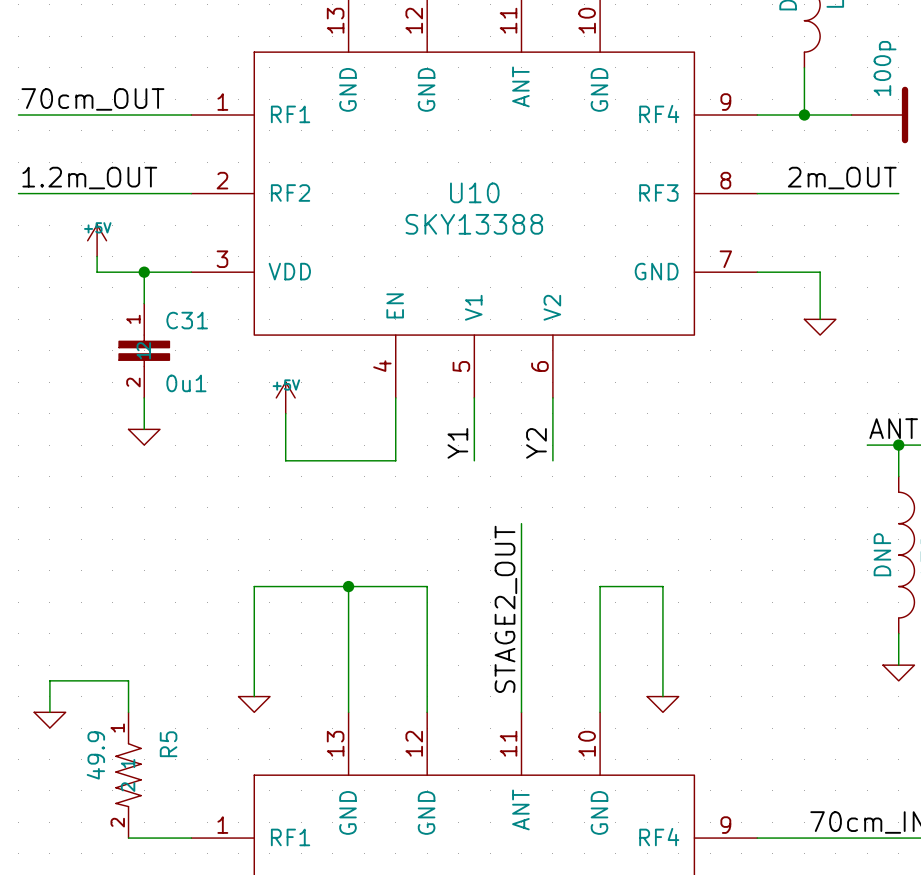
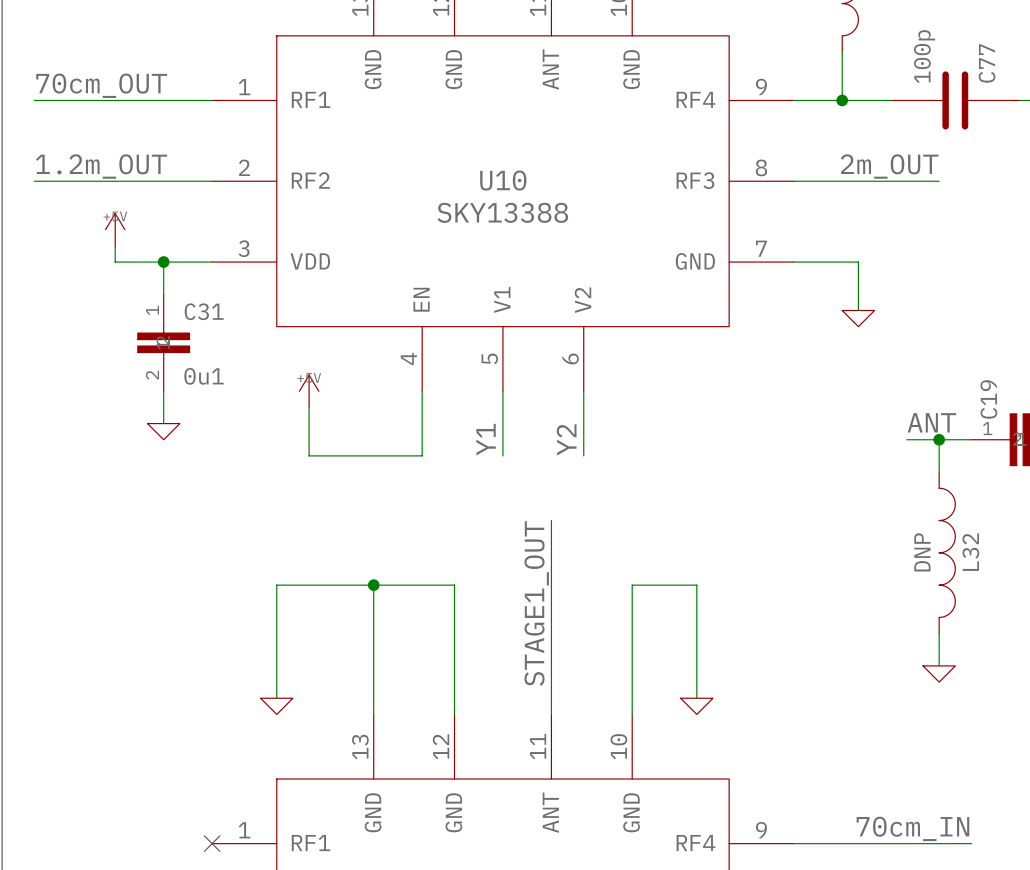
label: STAGE2_OUT (505, 609) -> STAGE1_OUT (536, 603)
wire: (49, 712) (49, 680) (128, 680) (128, 712) -> none
power symbol: (49, 720) -> none
R5: 49.9 (128, 775) -> none
wire: (128, 838) (191, 838) -> none
no-connect mark: none -> (212, 843)

